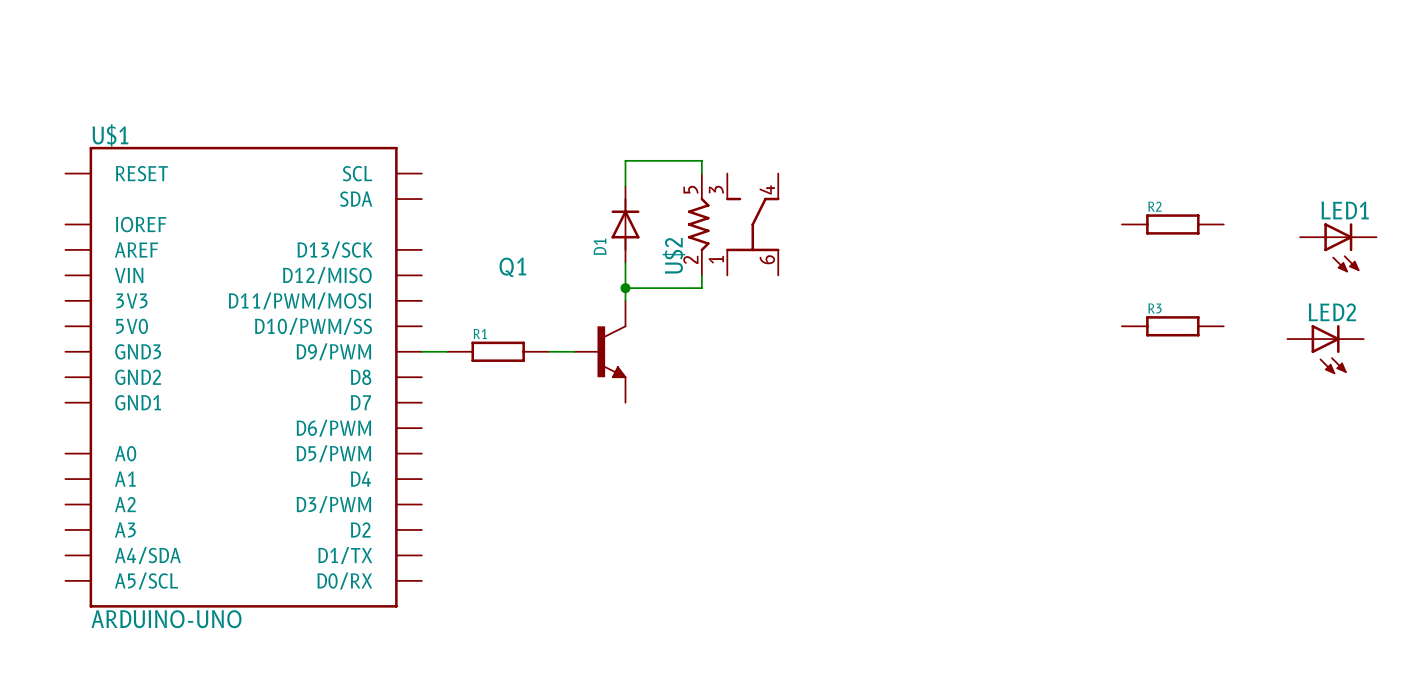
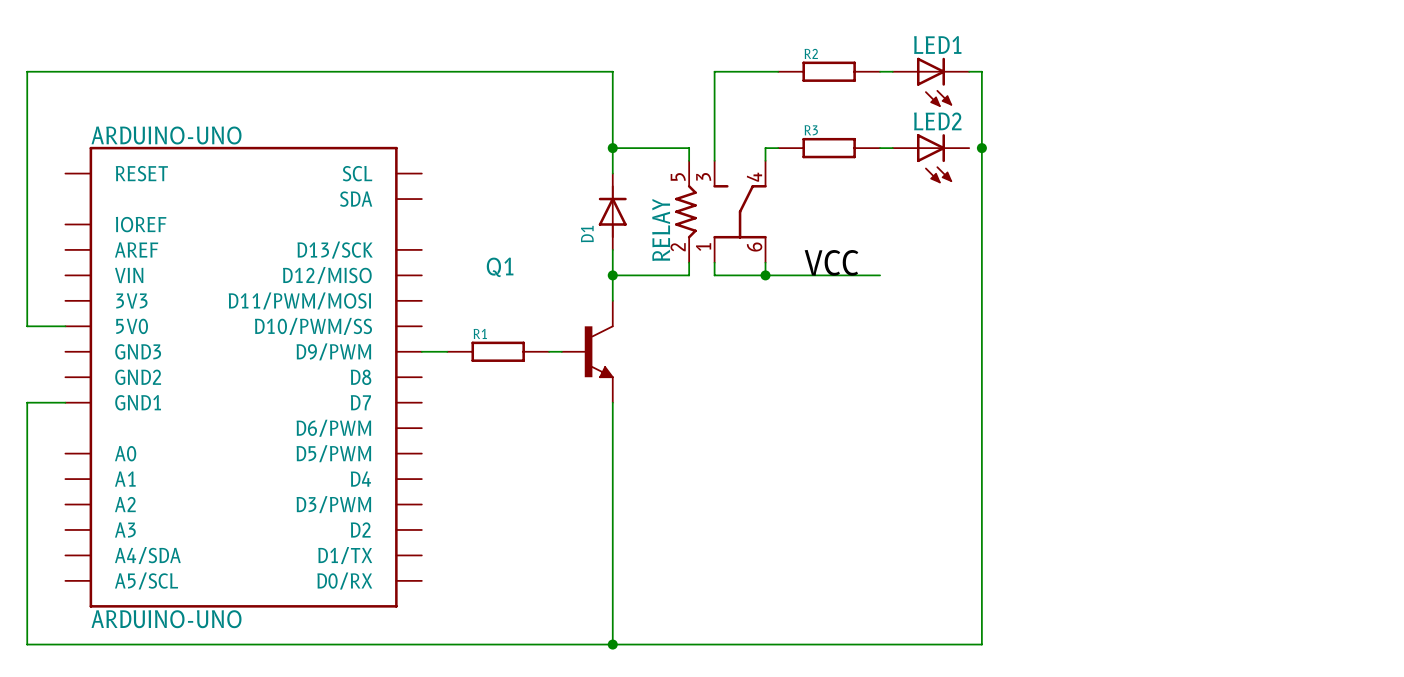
wire: none -> (778, 71) (714, 71) (714, 160)
wire: none -> (880, 71) (892, 71)
wire: none -> (969, 71) (981, 71) (981, 644) (27, 644) (27, 402) (65, 402)
U$1 name: U$1 (110, 135) -> ARDUINO-UNO (166, 135)
wire: none -> (612, 148) (689, 148) (689, 160)
junction: none -> (612, 148)
wire: none -> (778, 148) (765, 148) (765, 160)
wire: none -> (880, 148) (892, 148)
junction: none -> (981, 148)
wire: none -> (612, 173) (612, 71) (27, 71) (27, 326) (65, 326)
wire: (701, 173) (701, 160) (625, 160) (625, 186) -> none
RELAY: none -> (720, 211)
D1 position: (625, 224) -> (612, 211)
U$2: (733, 224) -> none
R2 position: (1172, 224) -> (829, 71)
LED1 position: (1338, 247) -> (930, 82)
wire: none -> (612, 249) (612, 300)
wire: (625, 262) (625, 300) -> none
wire: none -> (714, 262) (714, 275) (880, 275)
wire: none -> (765, 262) (765, 275)
label: none -> VCC (831, 262)
wire: (701, 275) (701, 288) (625, 288) -> (689, 262) (689, 275) (612, 275)
junction: none -> (765, 275)
junction position: (625, 288) -> (612, 275)
R3 position: (1172, 326) -> (829, 148)
LED2 position: (1325, 349) -> (930, 158)
Q1 position: (600, 351) -> (587, 351)
wire: none -> (612, 402) (612, 644)
junction: none -> (612, 644)

